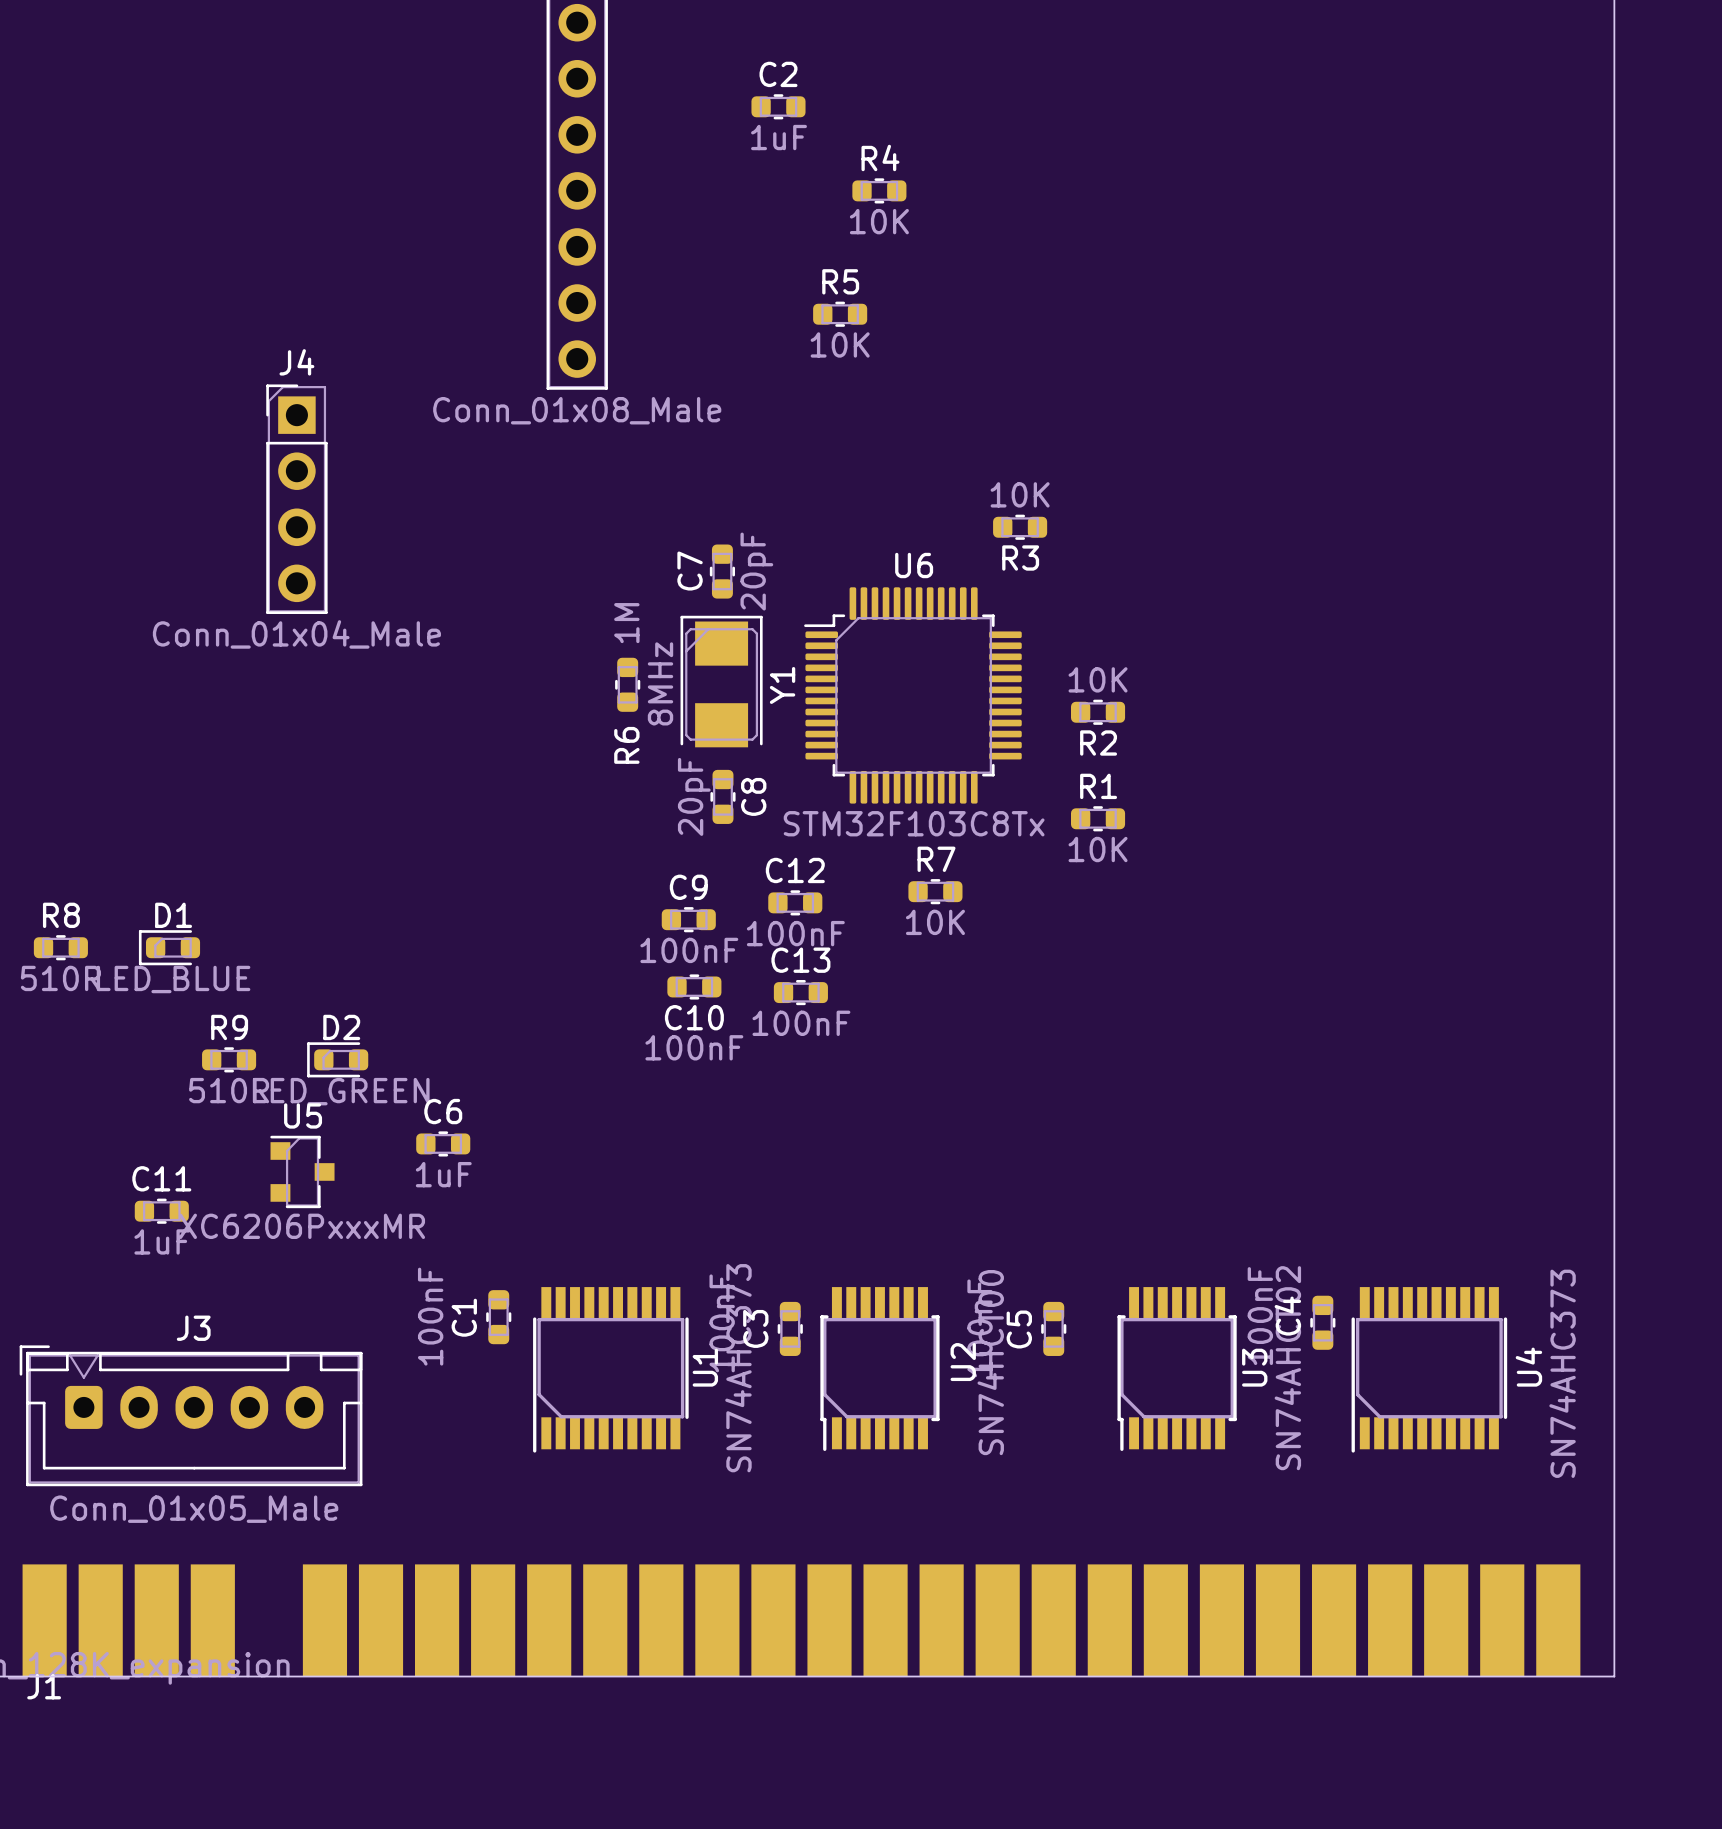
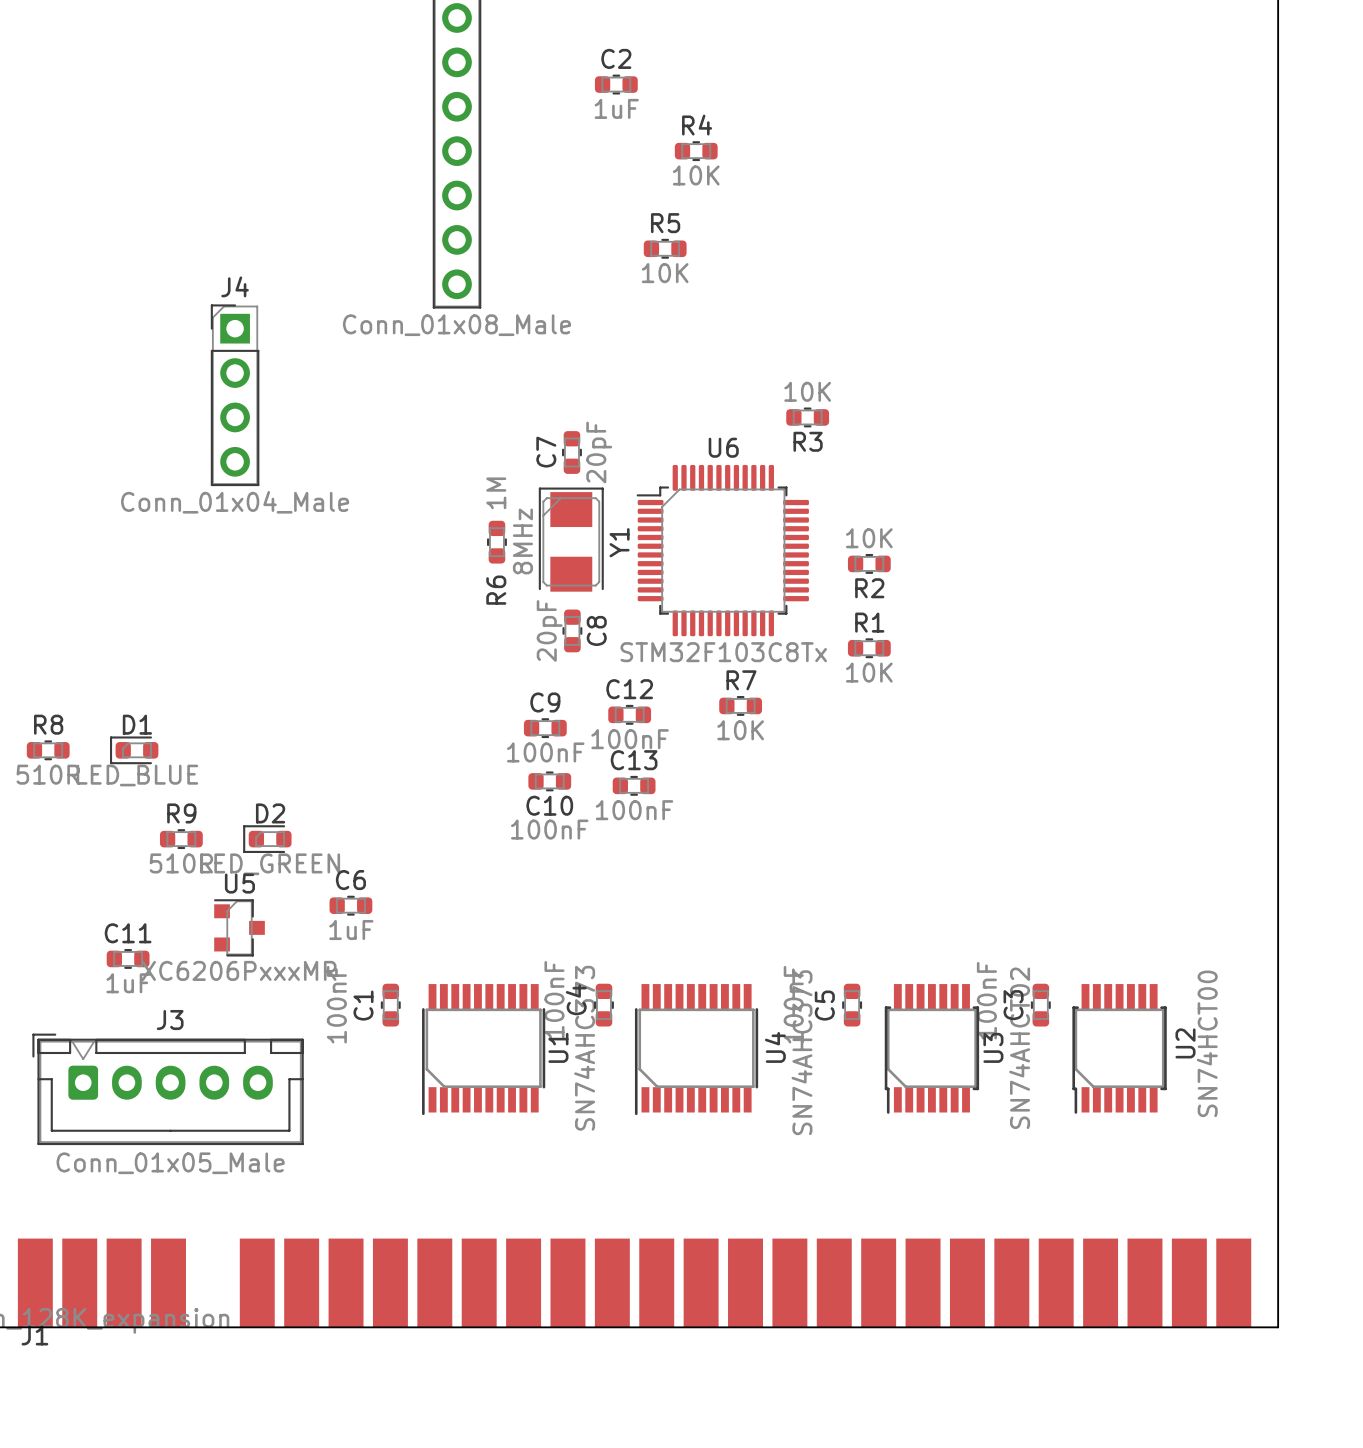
C1 position: (498, 1317) -> (390, 1005)
C4 position: (1322, 1322) -> (603, 1005)
C3 position: (790, 1328) -> (1040, 1005)
C5 position: (1053, 1328) -> (852, 1005)
U1 position: (610, 1369) -> (483, 1049)
U2 position: (879, 1369) -> (1119, 1048)
U3 position: (1177, 1369) -> (931, 1048)
U4 position: (1429, 1369) -> (696, 1049)
J3 position: (191, 1415) -> (168, 1089)

